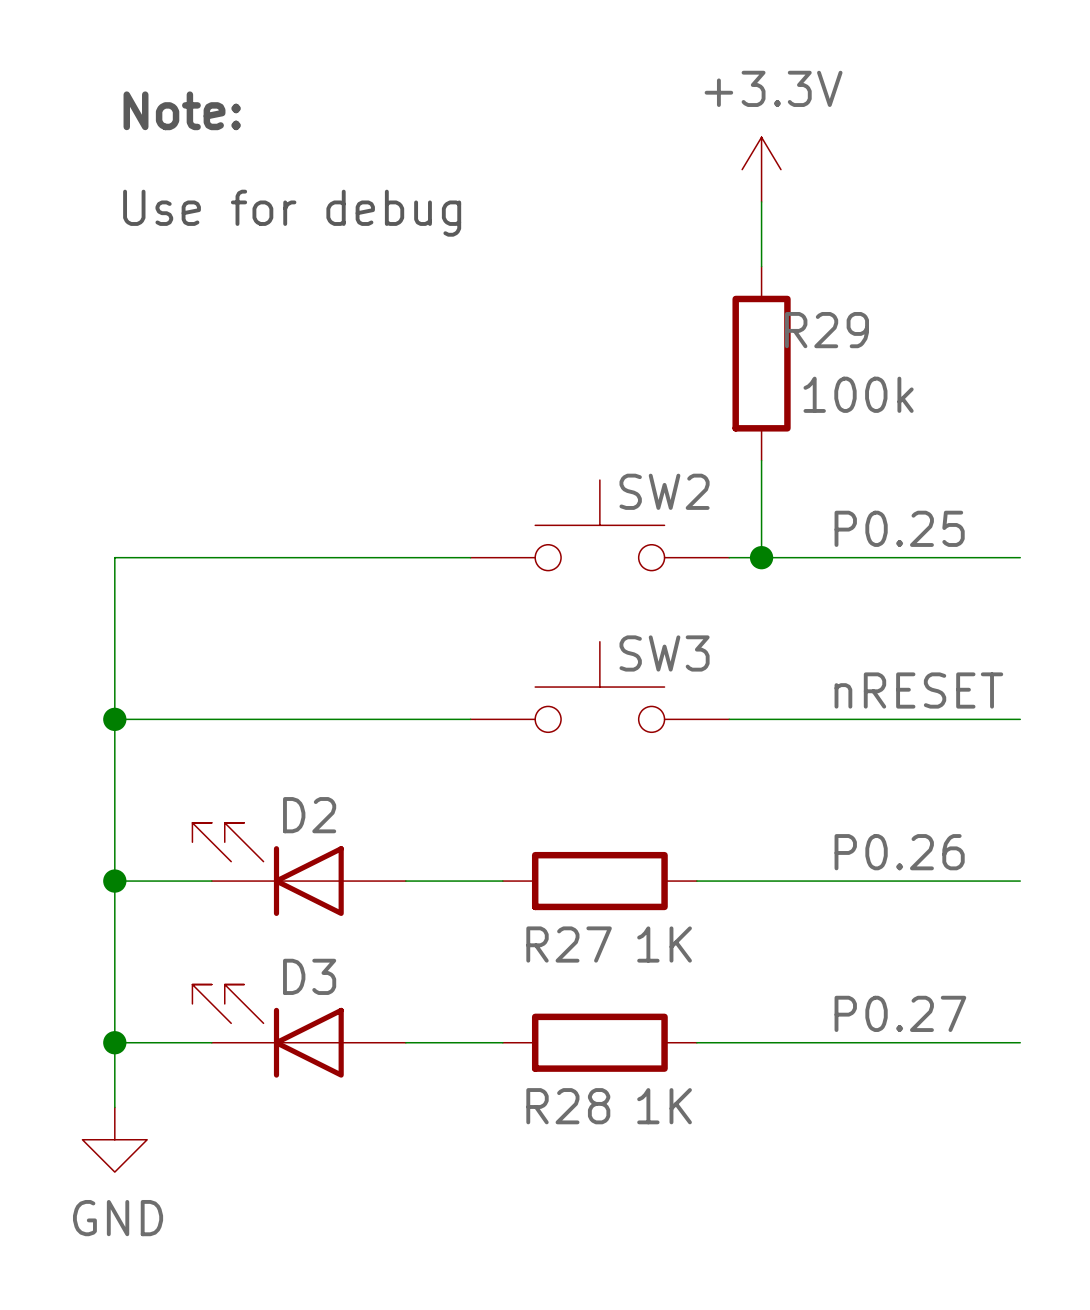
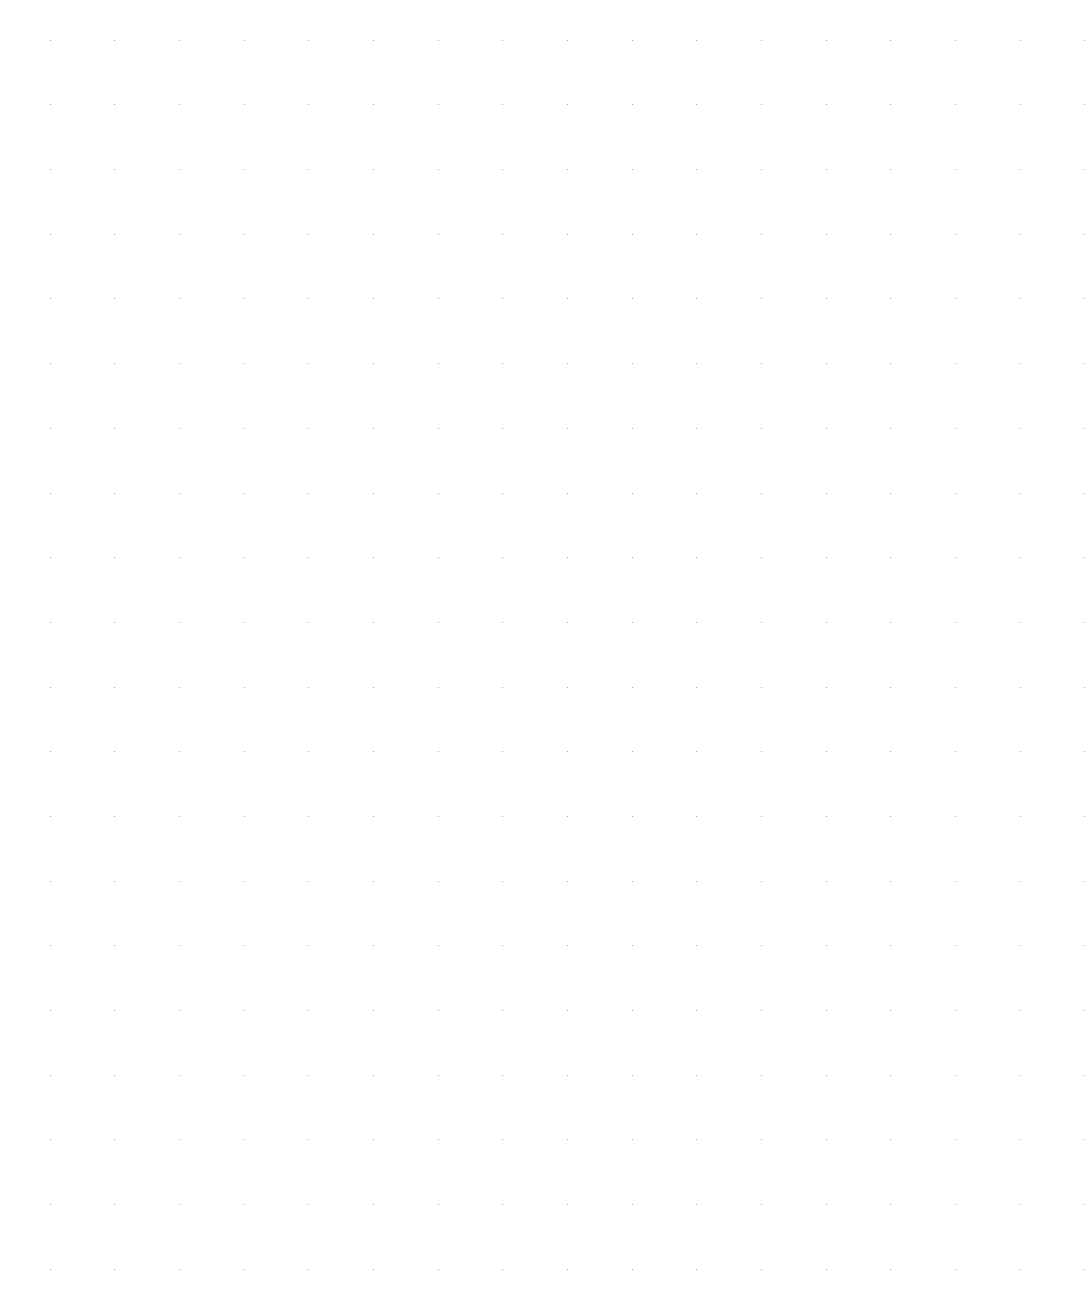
text: Note: (182, 110) -> none
power symbol: +3.3V (761, 169) -> none
wire: (761, 201) (761, 266) -> none
text: Use for debug (292, 213) -> none
R29: 100k (761, 363) -> none
wire: (761, 460) (761, 557) -> none
SW2: (599, 525) -> none
label: P0.25 (899, 528) -> none
wire: (470, 557) (114, 557) (114, 1107) -> none
wire: (729, 557) (1020, 557) -> none
junction: (761, 557) -> none
SW3: (599, 687) -> none
label: nRESET (918, 690) -> none
wire: (114, 719) (470, 719) -> none
junction: (114, 719) -> none
wire: (729, 719) (1020, 719) -> none
label: P0.26 (899, 852) -> none
D2: (299, 869) -> none
wire: (114, 881) (211, 881) -> none
junction: (114, 881) -> none
wire: (405, 881) (502, 881) -> none
R27: 1K (599, 881) -> none
wire: (696, 881) (1020, 881) -> none
label: P0.27 (900, 1013) -> none
D3: (299, 1031) -> none
wire: (114, 1042) (211, 1042) -> none
junction: (114, 1042) -> none
wire: (405, 1042) (502, 1042) -> none
R28: 1K (599, 1042) -> none
wire: (696, 1042) (1020, 1042) -> none
power symbol: GND (114, 1139) -> none

